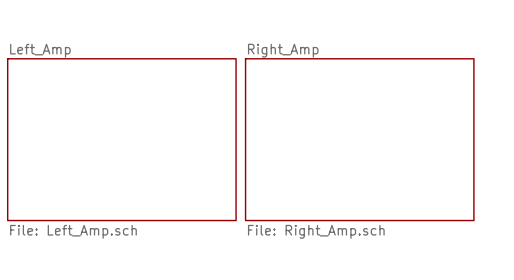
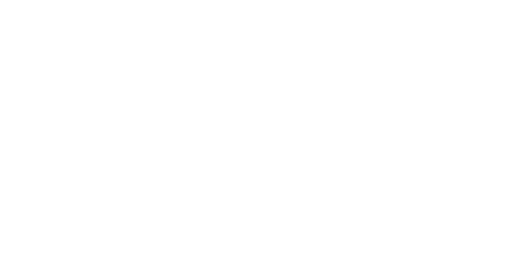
sheet Left_Amp: File: Left_Amp.sch (121, 139) -> none
sheet Right_Amp: File: Right_Amp.sch (359, 139) -> none

